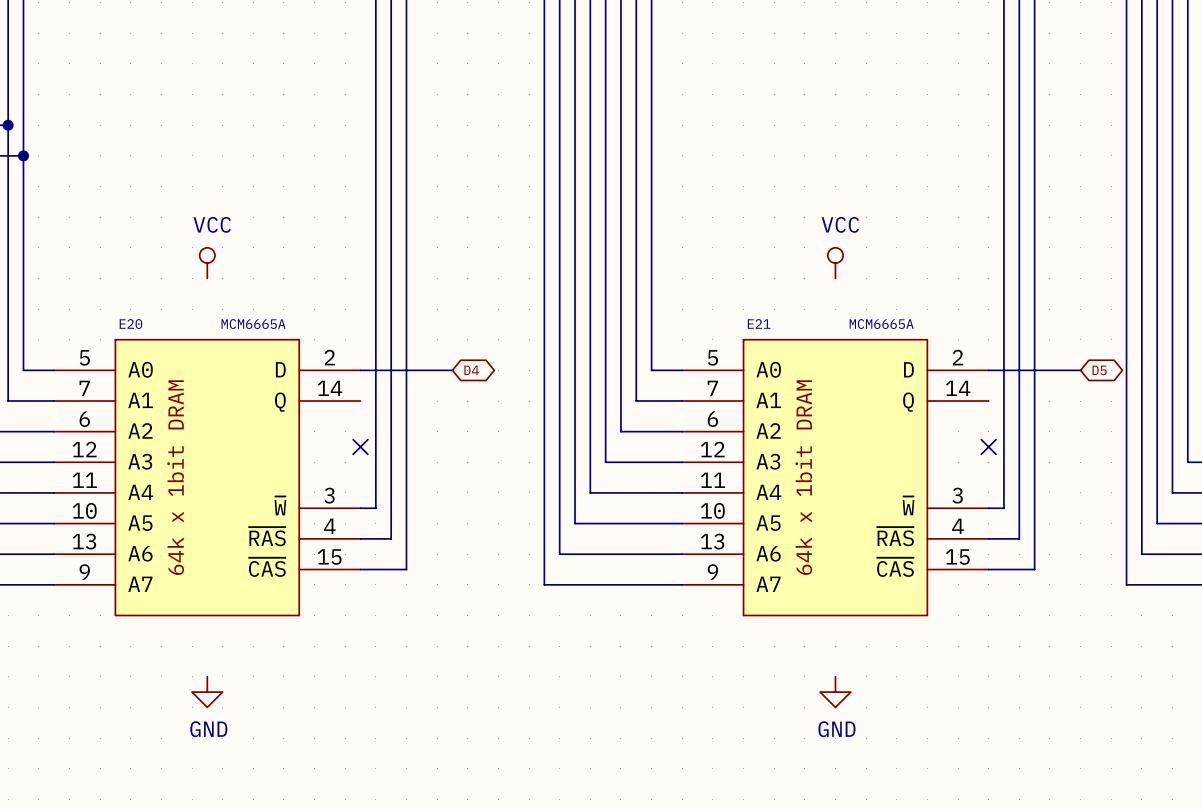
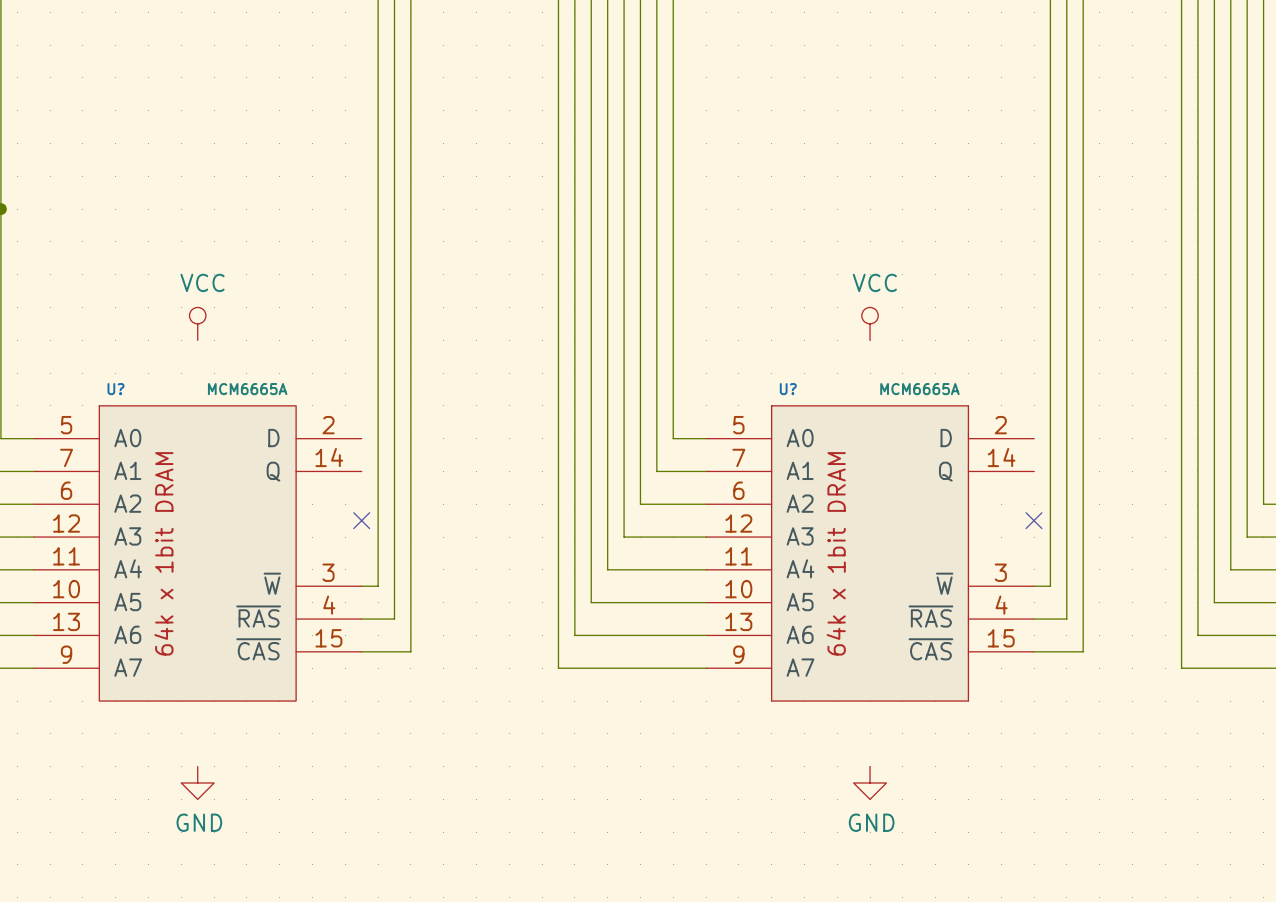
E21 name: E21 (759, 323) -> U? (788, 389)
E20 name: E20 (130, 324) -> U? (115, 389)
wire: (360, 370) (452, 370) -> none
global label: D4 (471, 370) -> none
wire: (988, 370) (1080, 370) -> none
global label: D5 (1099, 370) -> none

